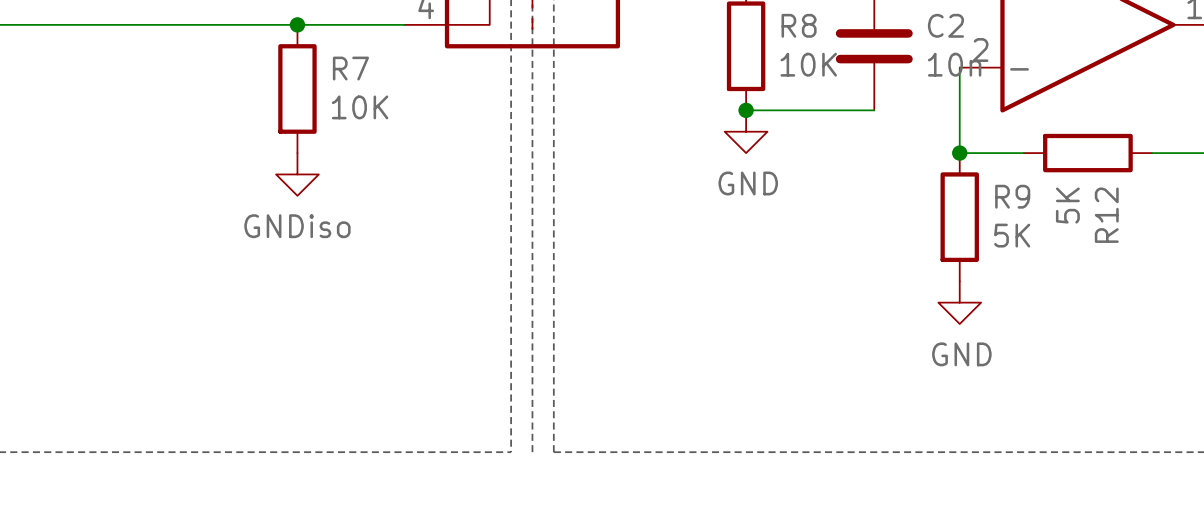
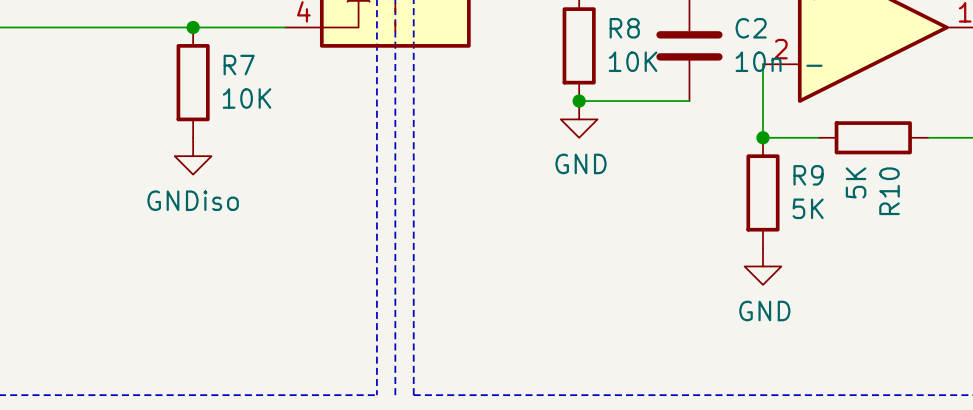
R12 name: R12 (1106, 215) -> R10 (889, 191)

